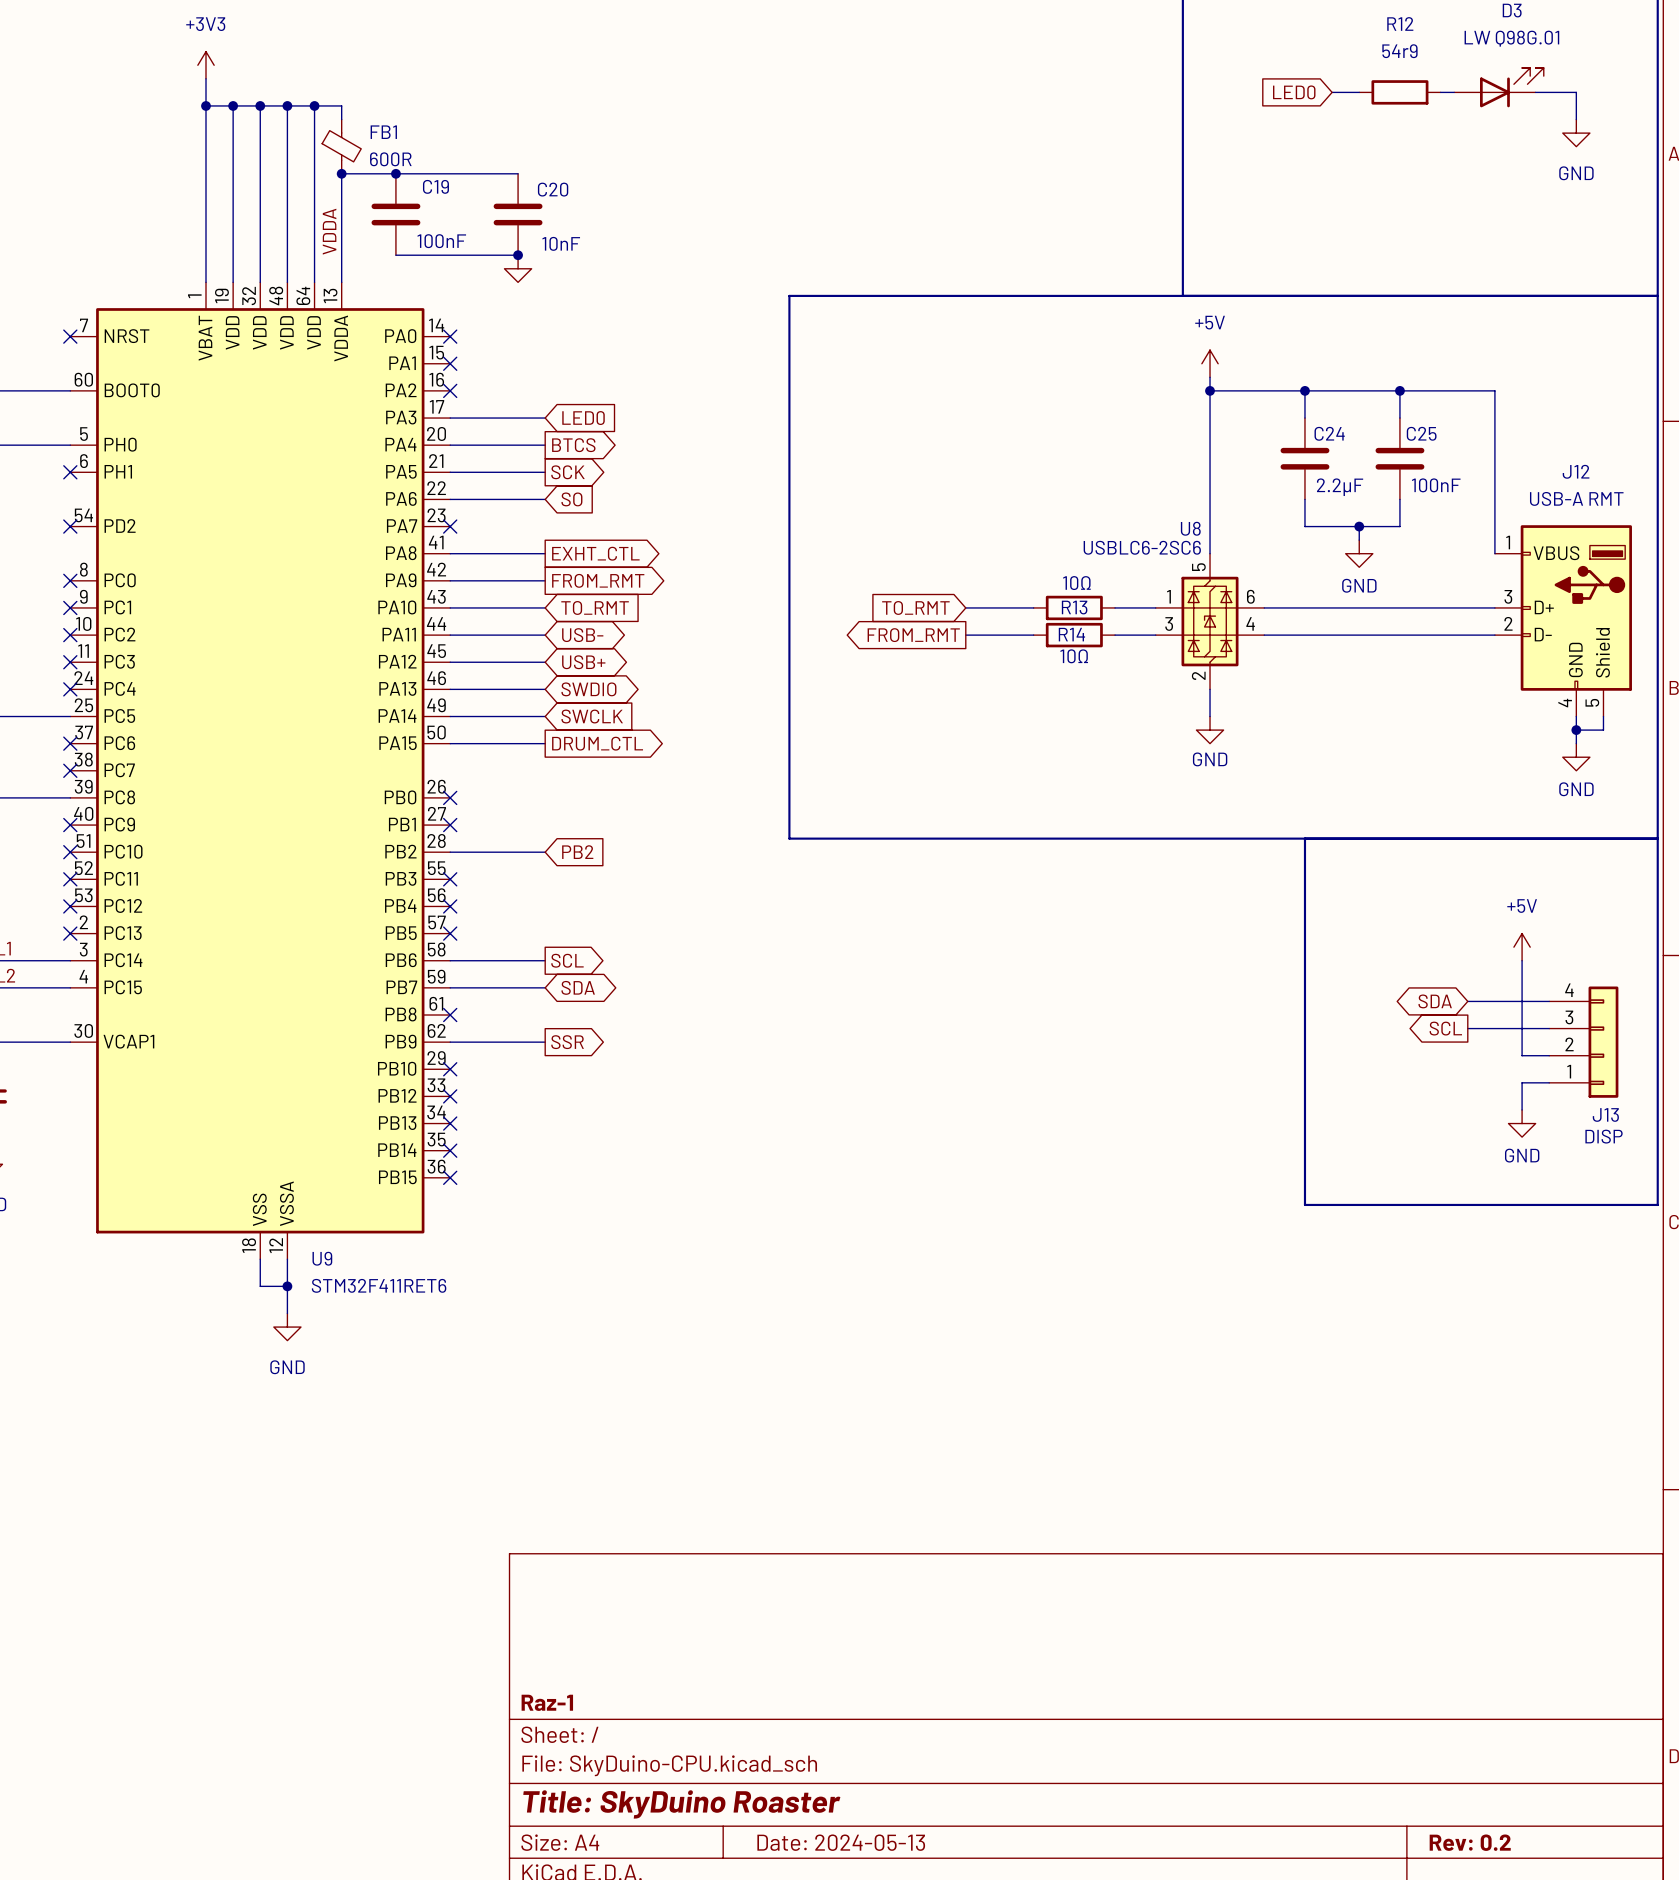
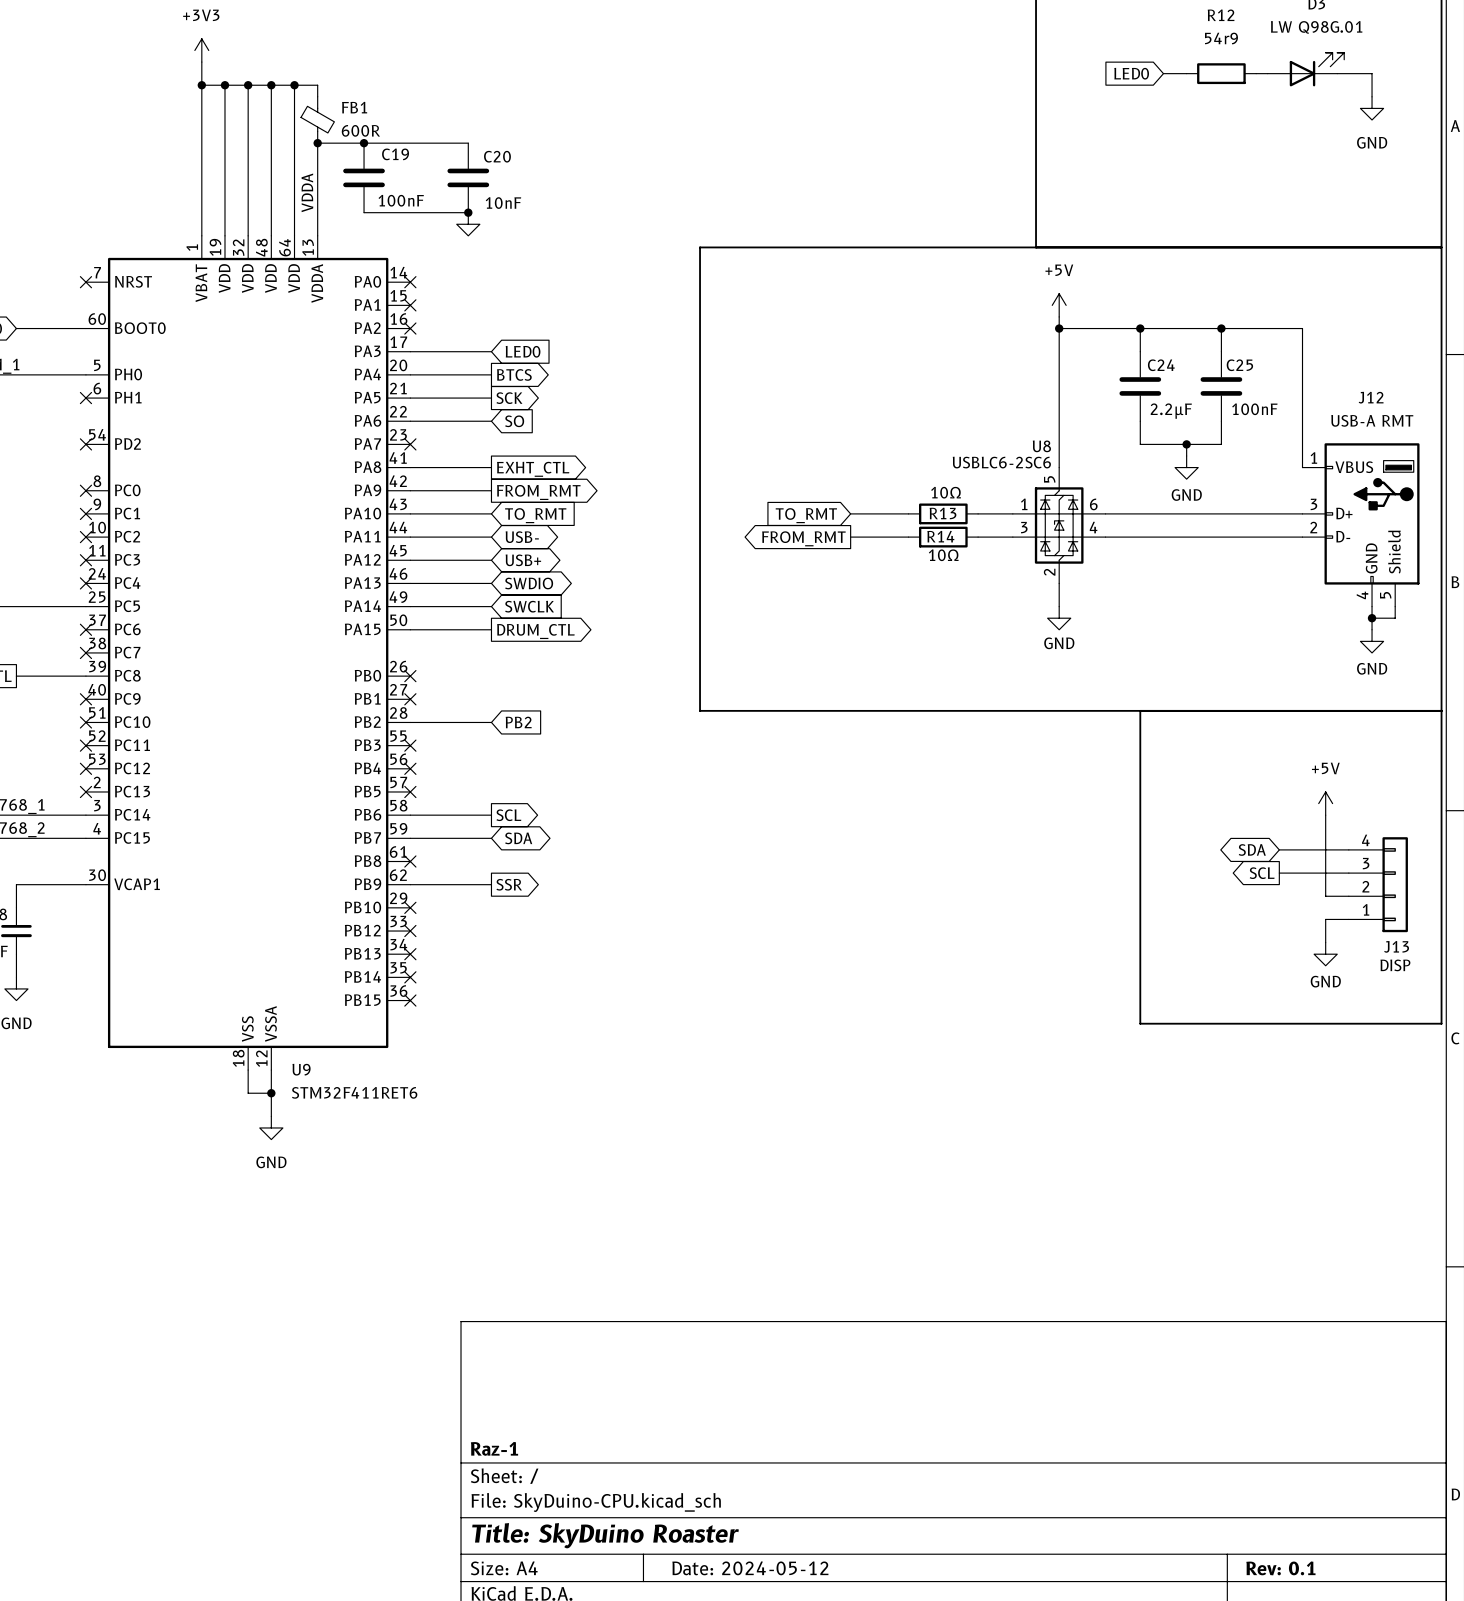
title block: Date: 2024-05-13 (841, 1842) -> Date: 2024-05-12 (750, 1568)
title block: Rev: 0.2 (1470, 1842) -> Rev: 0.1 (1280, 1568)

